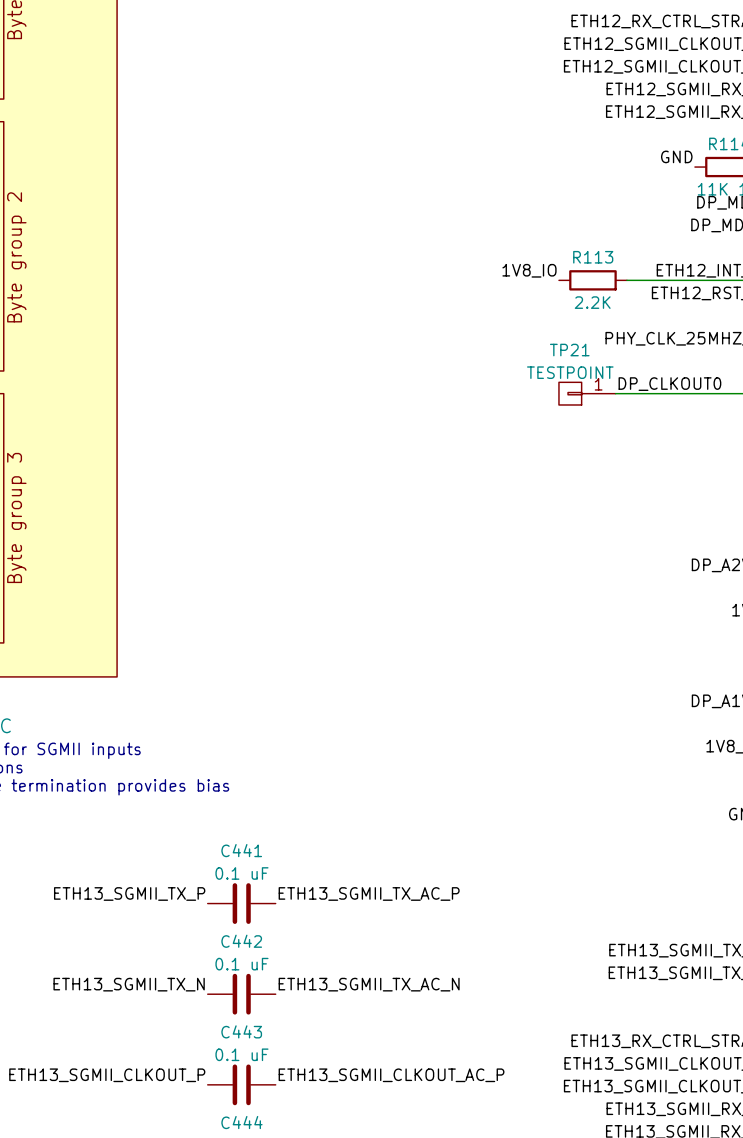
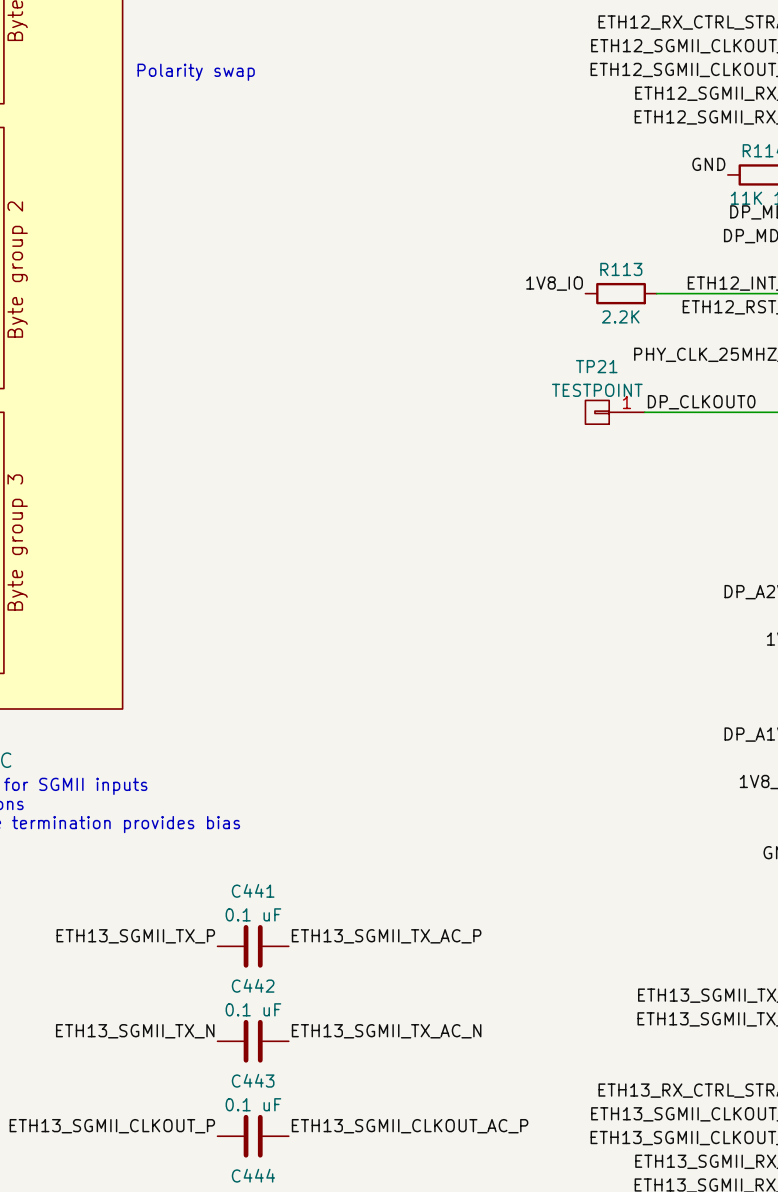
text: none -> Polarity swap (196, 72)

